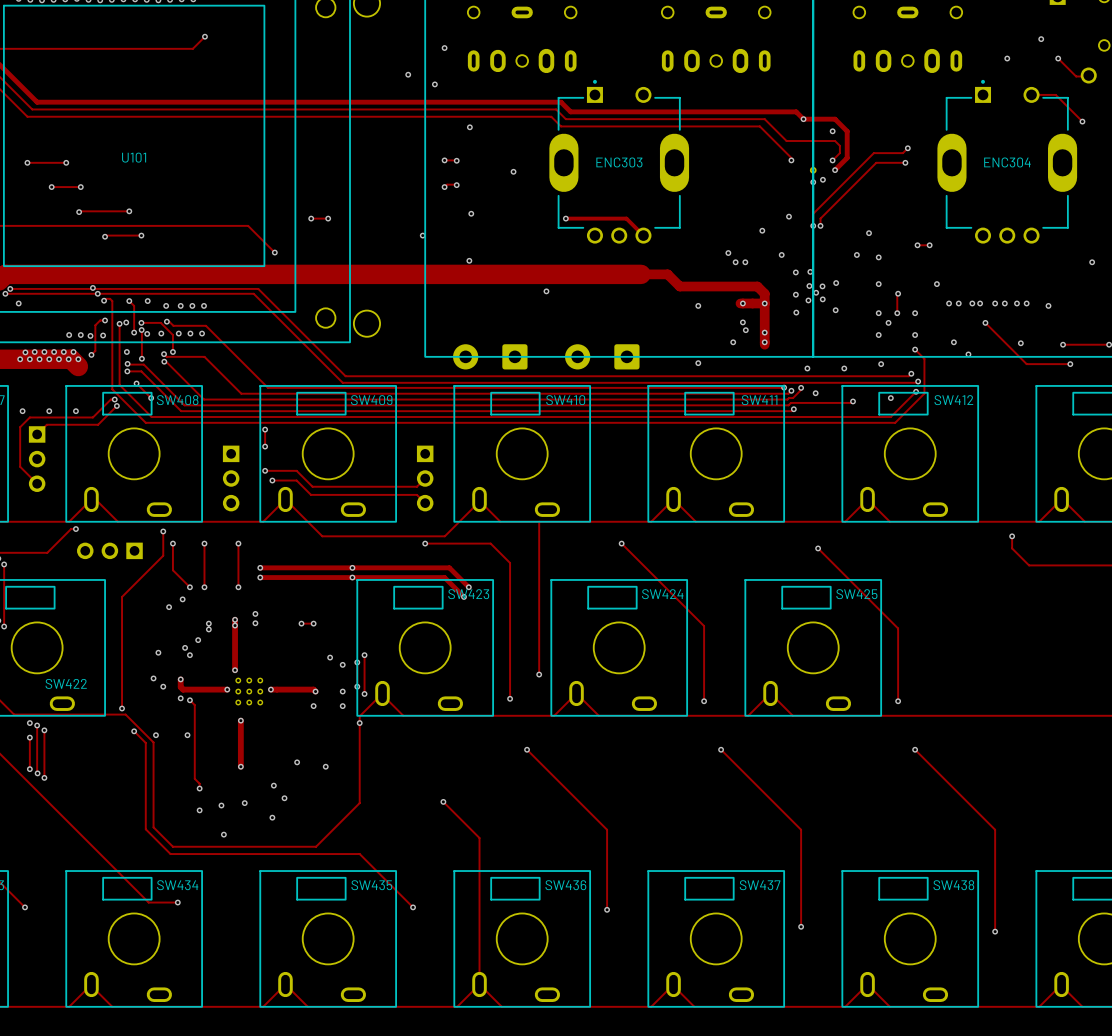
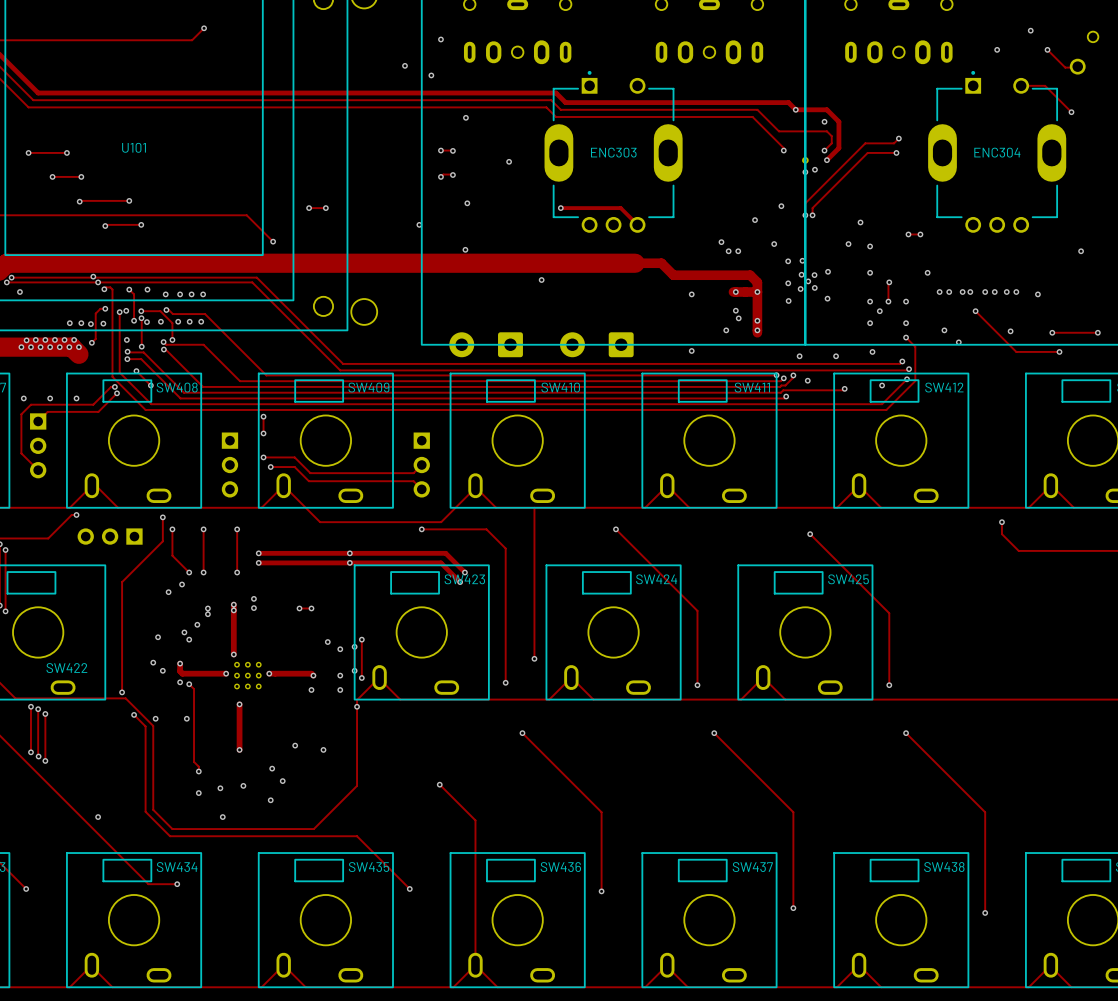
track: none -> (30, 706) (30, 721)
via: (29, 737) -> none
via: none -> (98, 817)

